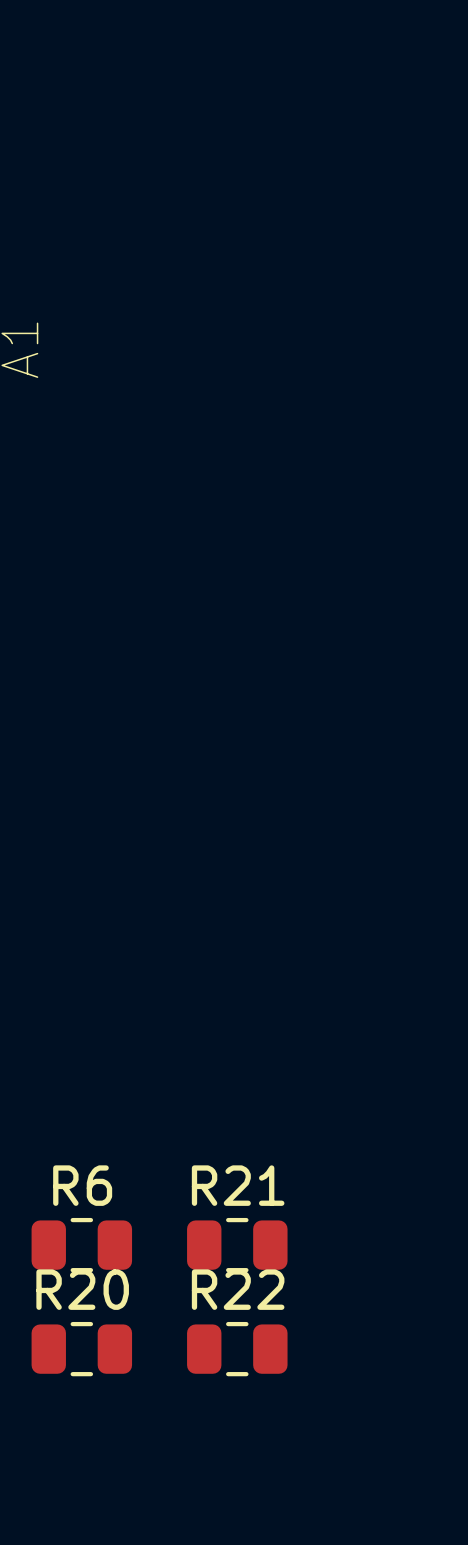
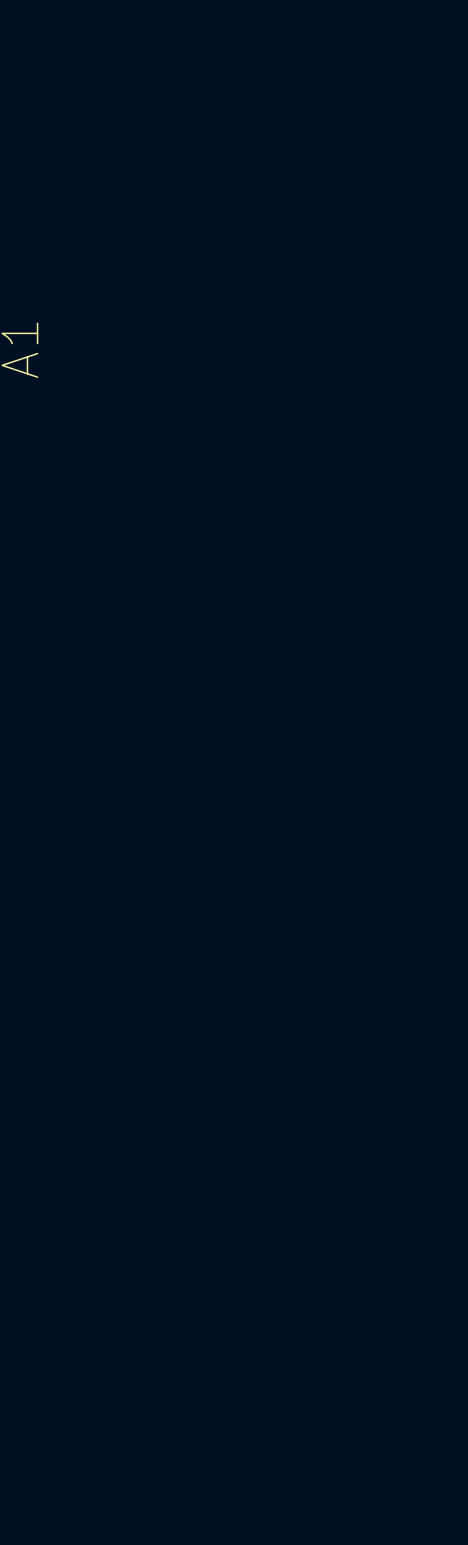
R6: (81, 1245) -> none
R21: (237, 1245) -> none
R20: (81, 1349) -> none
R22: (237, 1349) -> none

